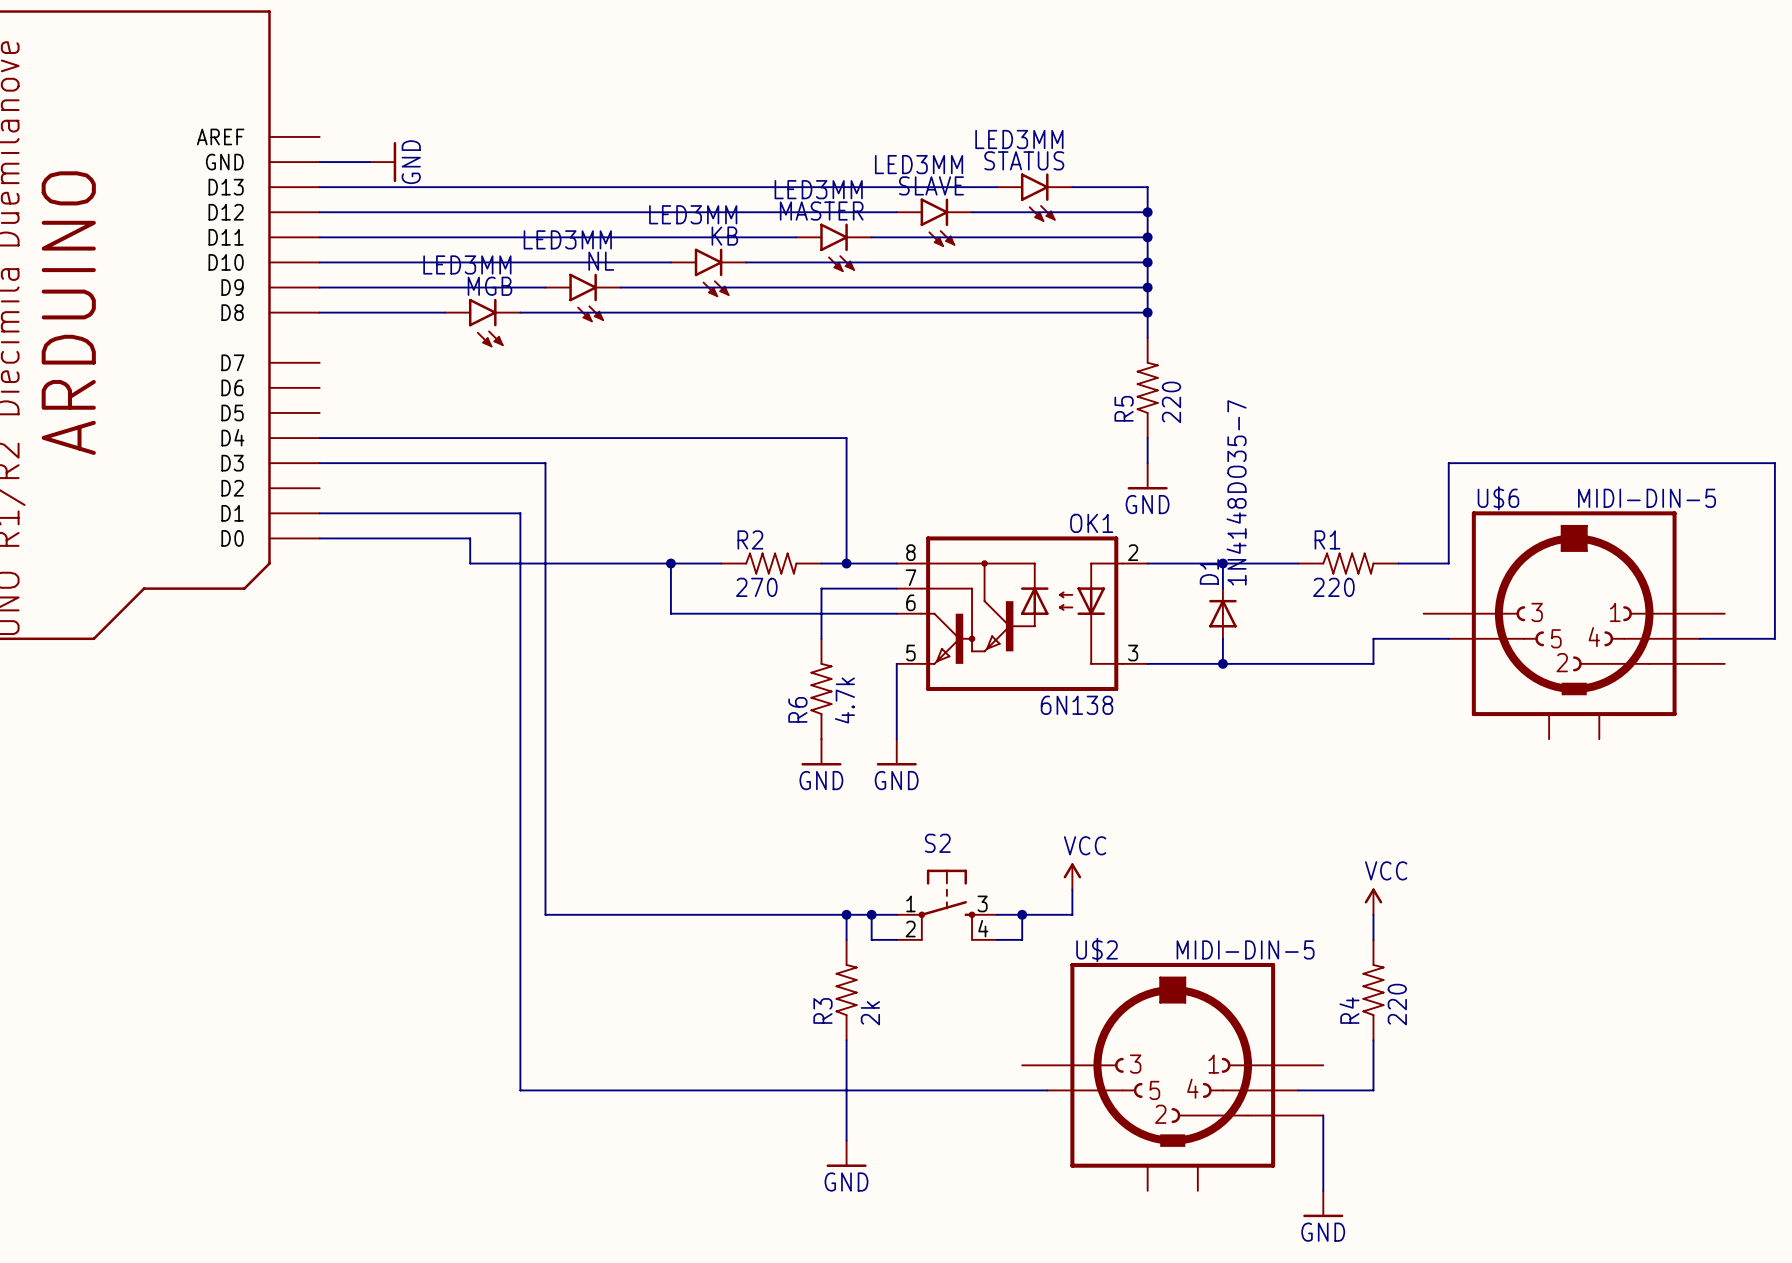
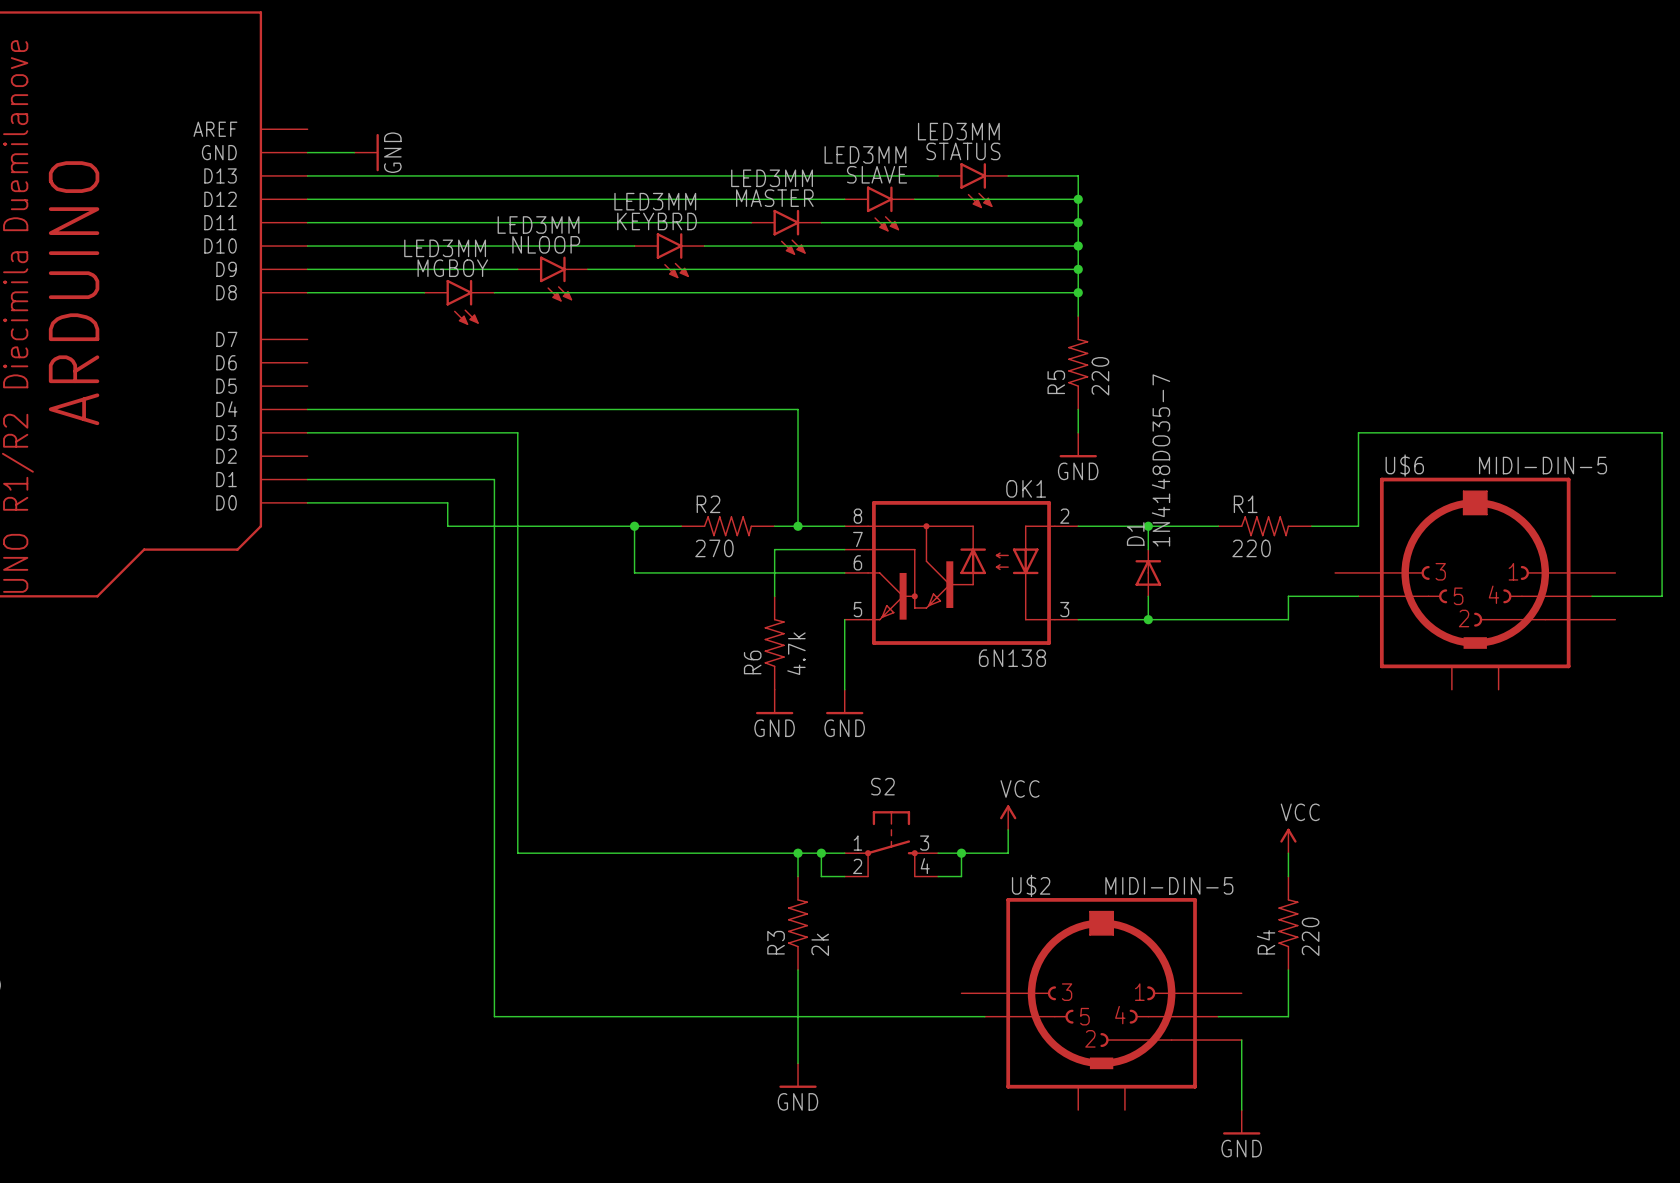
KB name: KB (724, 236) -> KEYBRD (657, 221)
NL name: NL (601, 261) -> NLOOP (546, 244)
MGB name: MGB (489, 286) -> MGBOY (452, 268)

